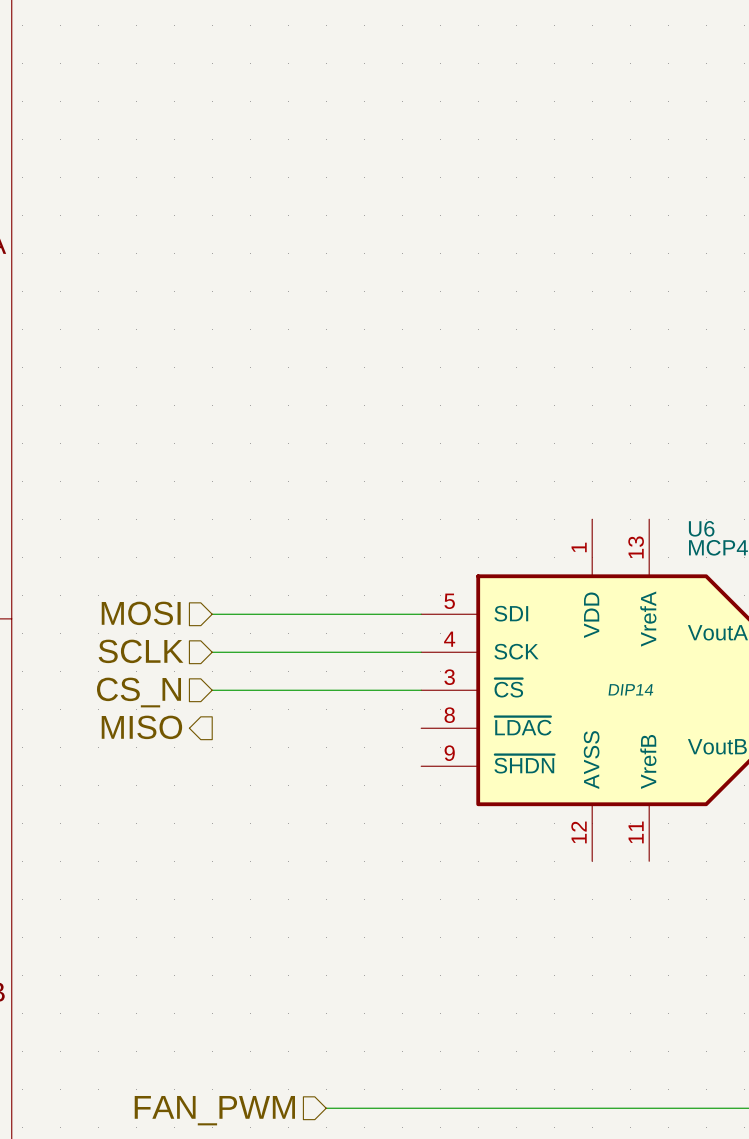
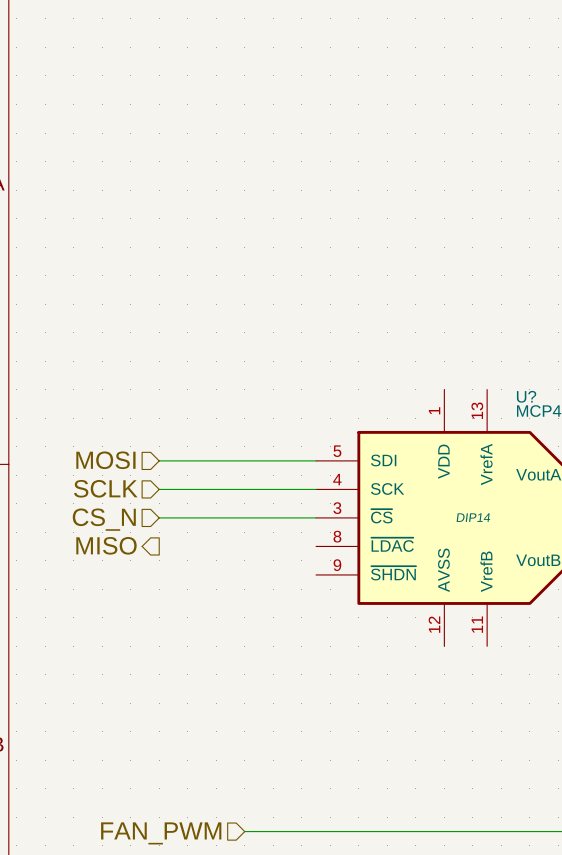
U6 name: U6 (701, 528) -> U? (526, 396)

